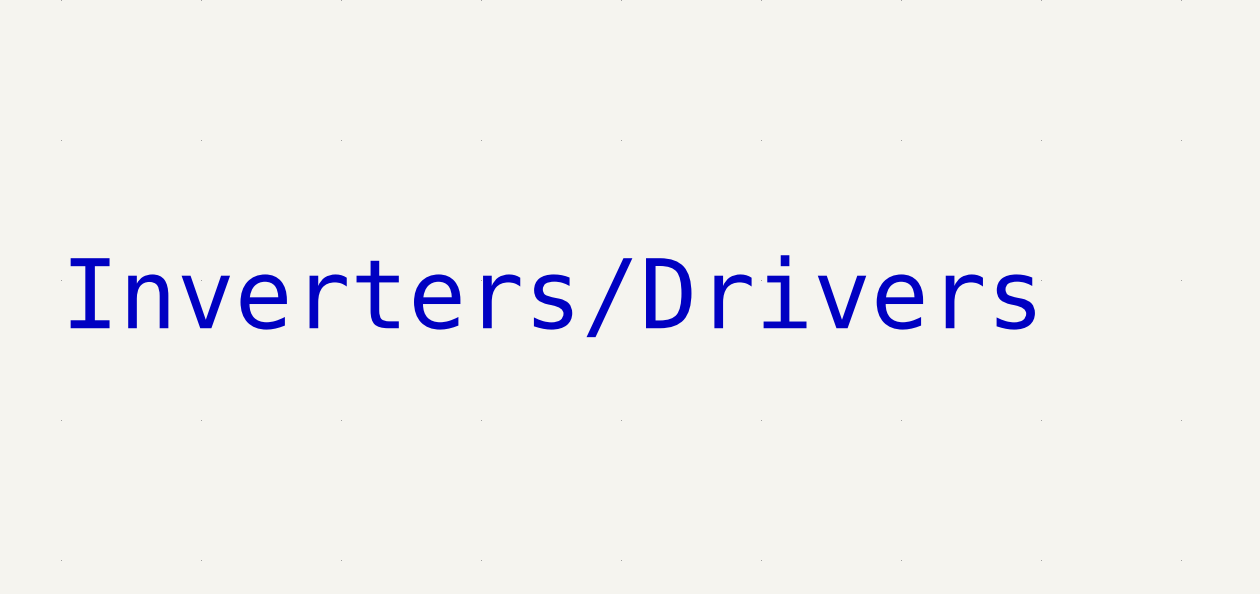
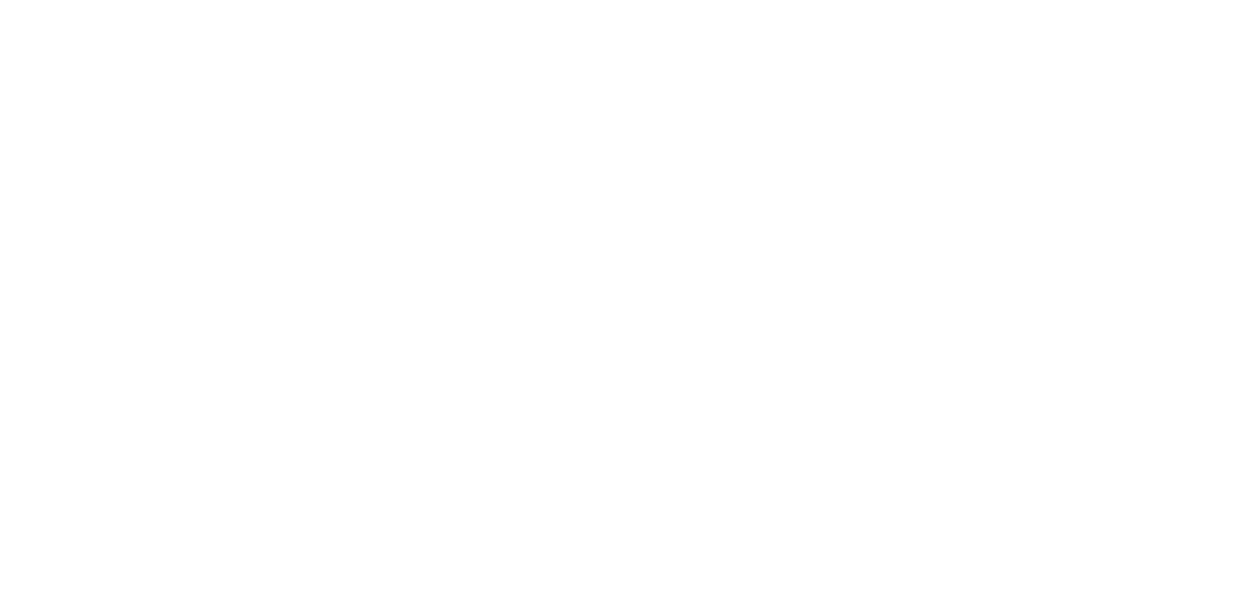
text: Inverters/Drivers (552, 296) -> none

